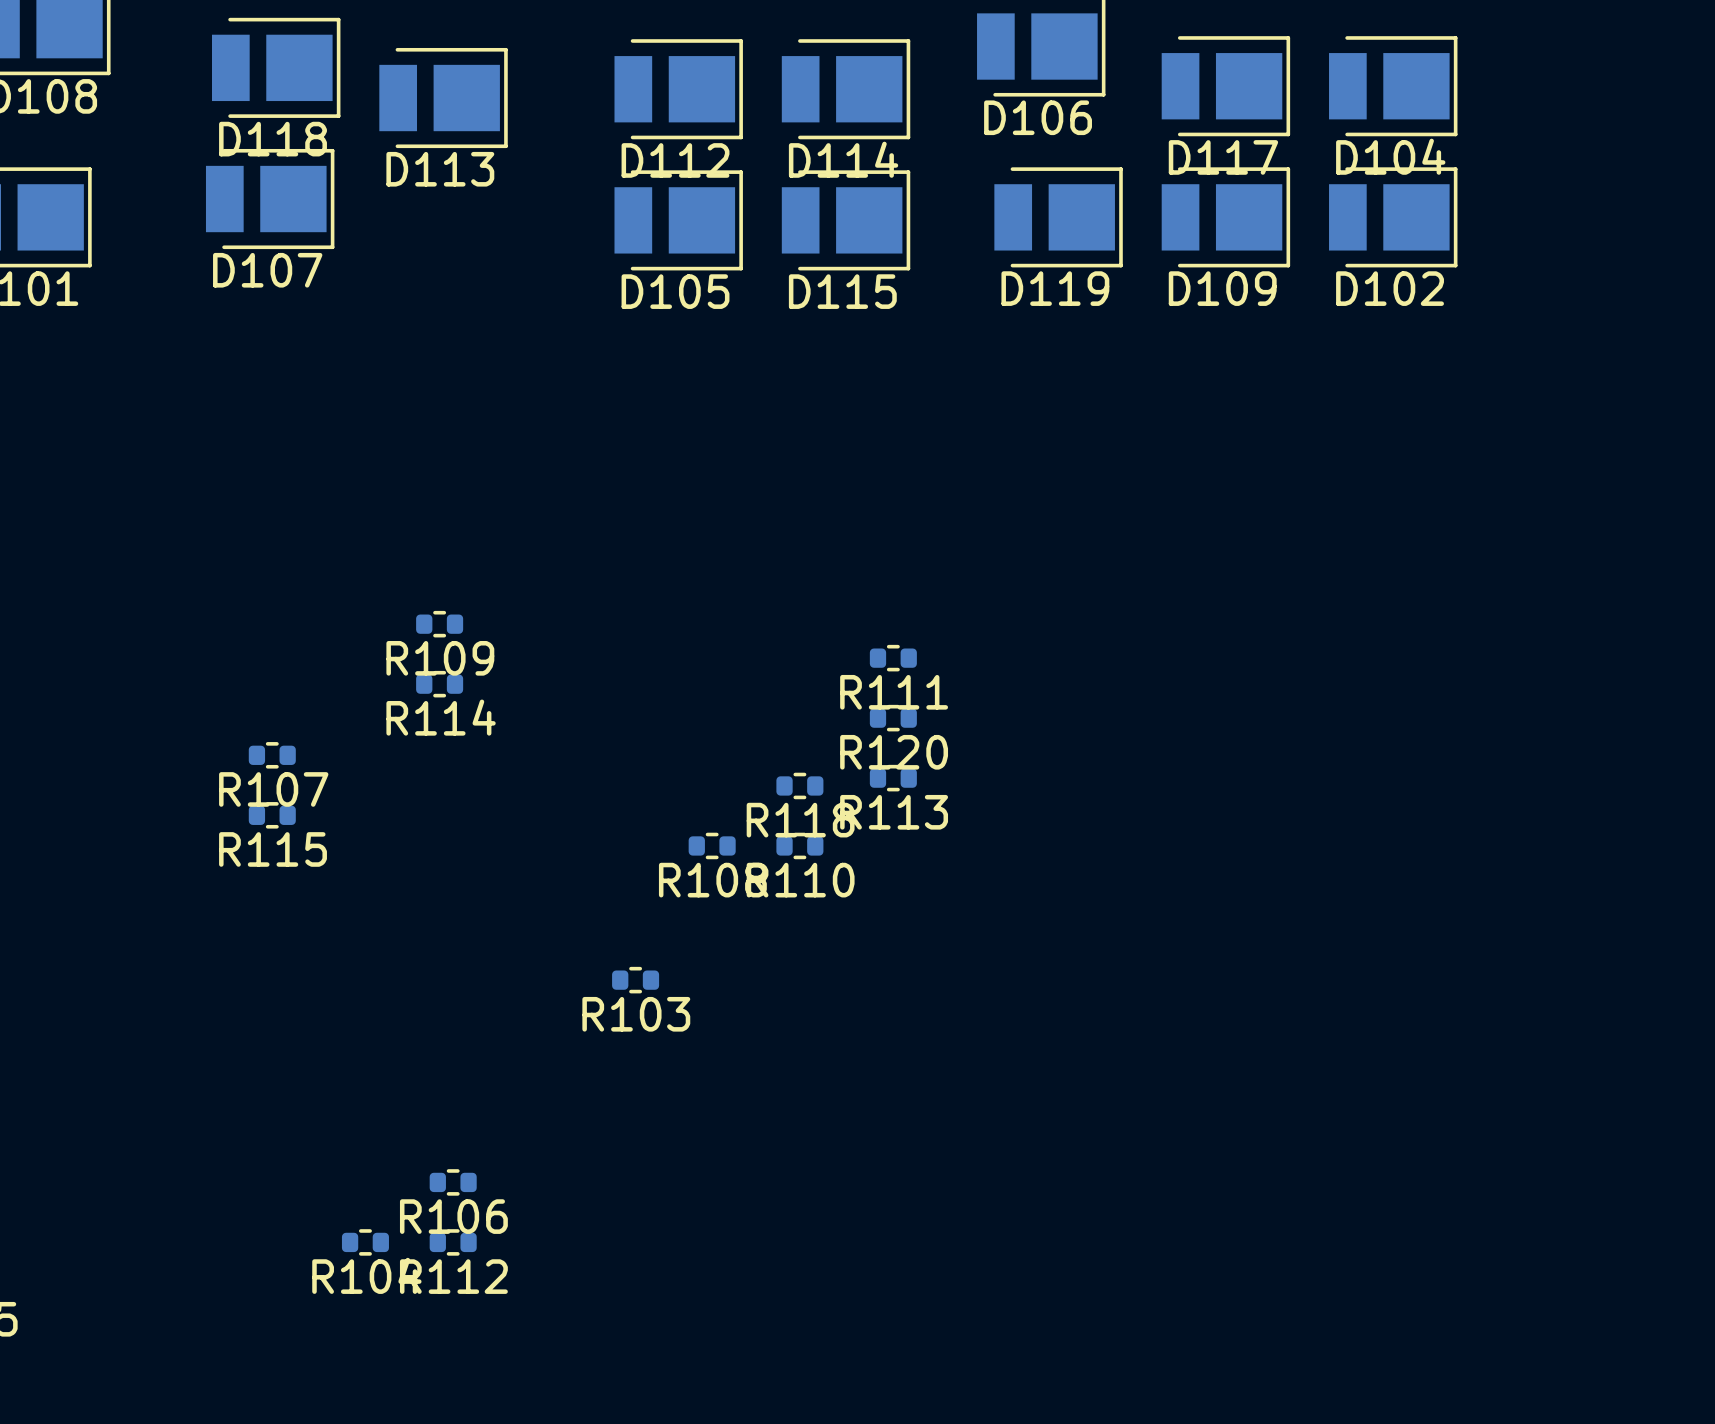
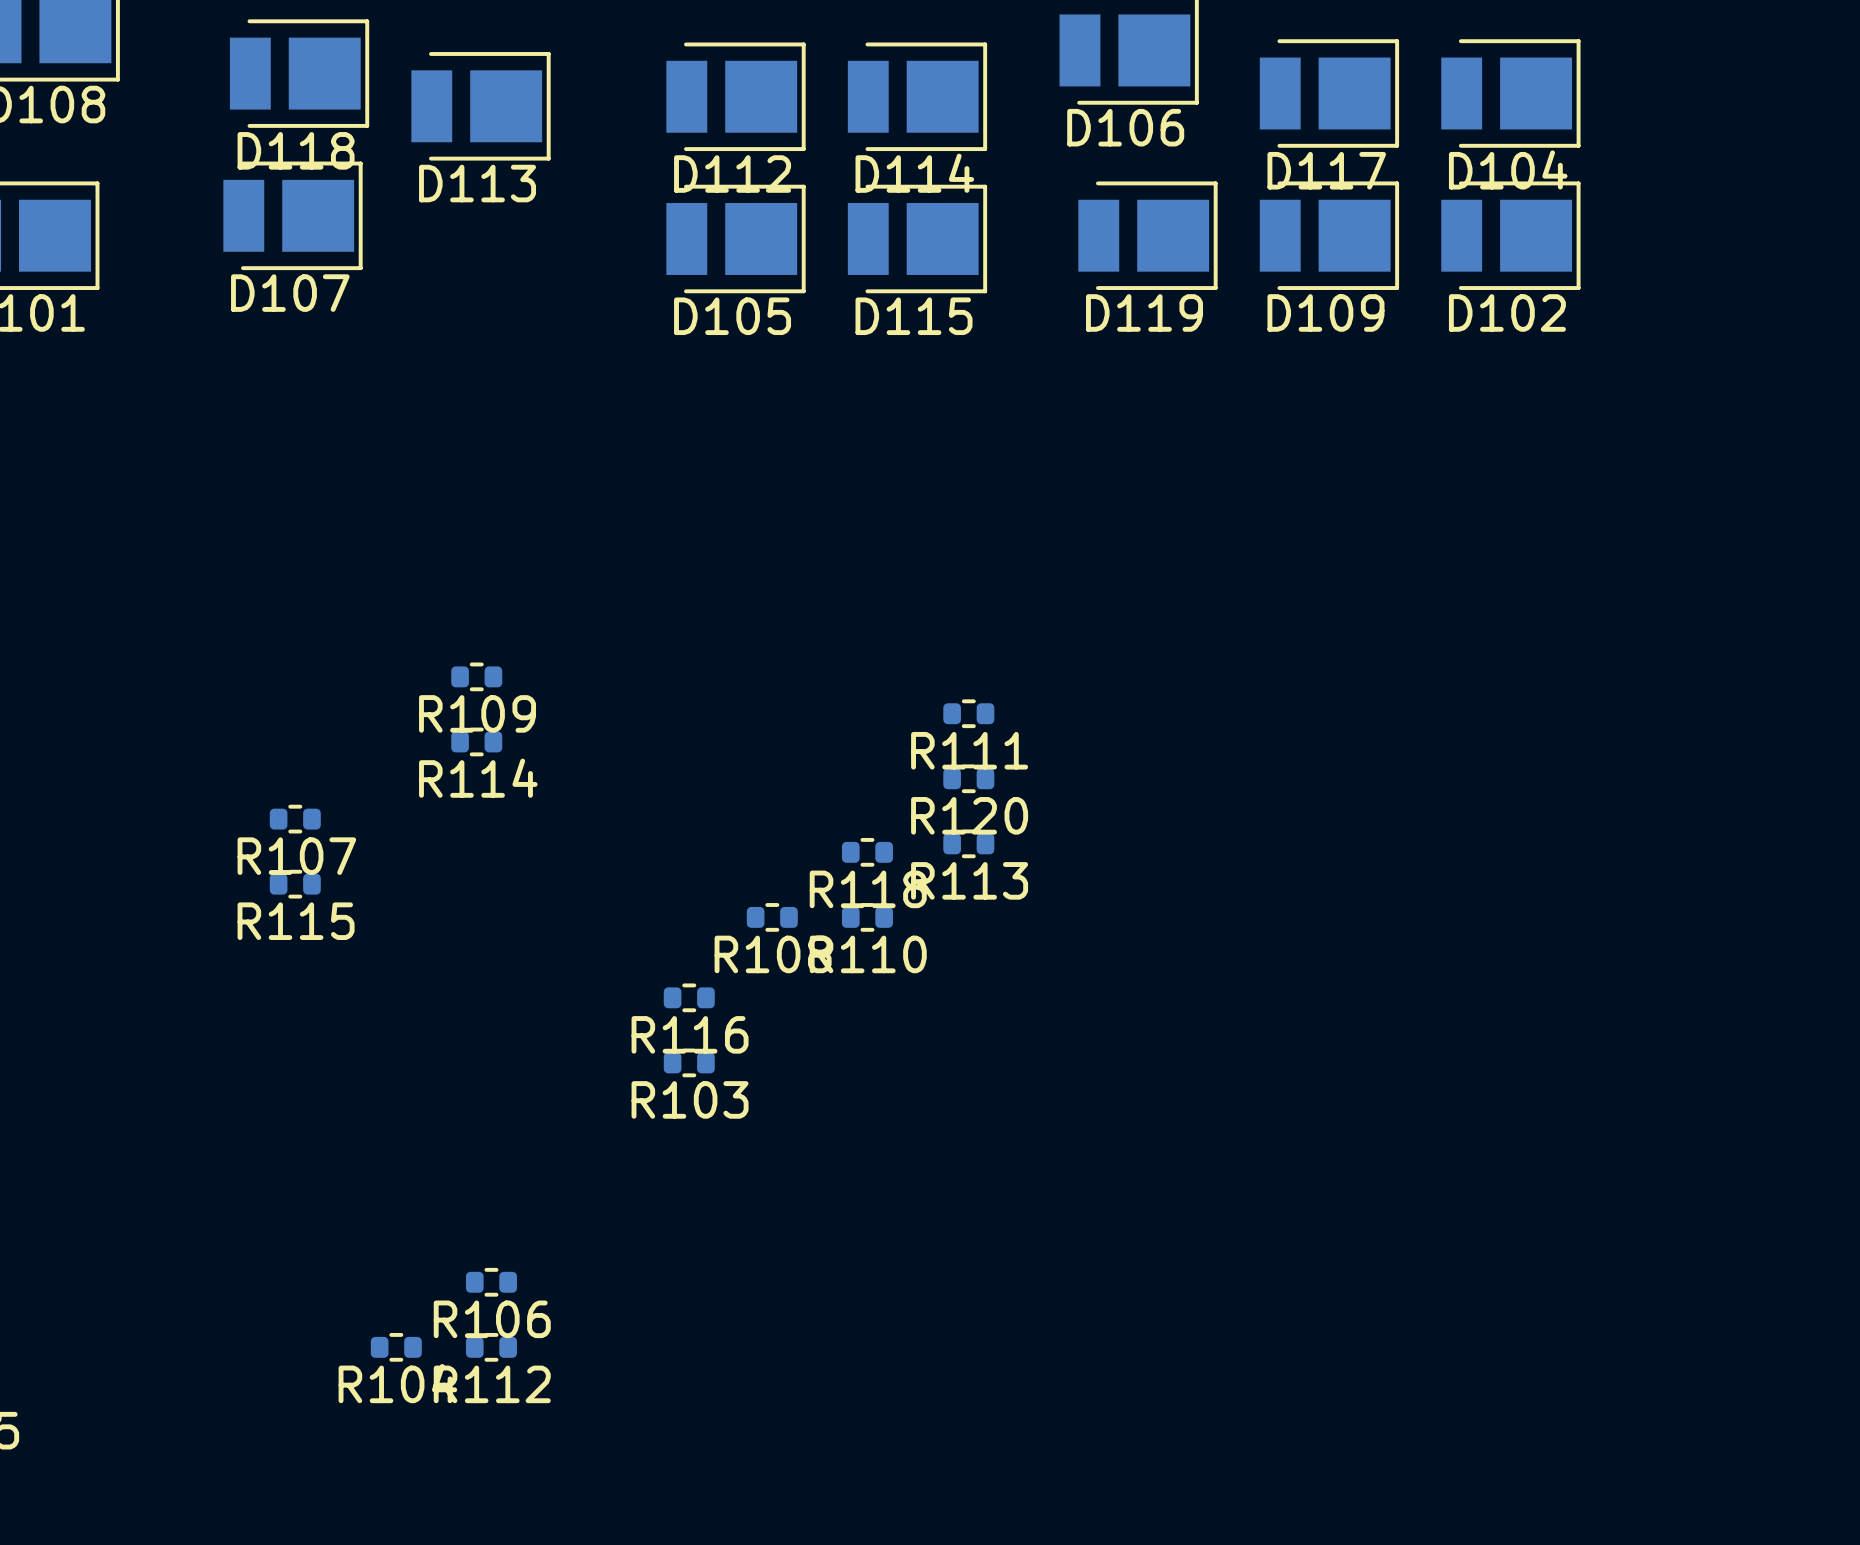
R116: none -> (689, 997)

